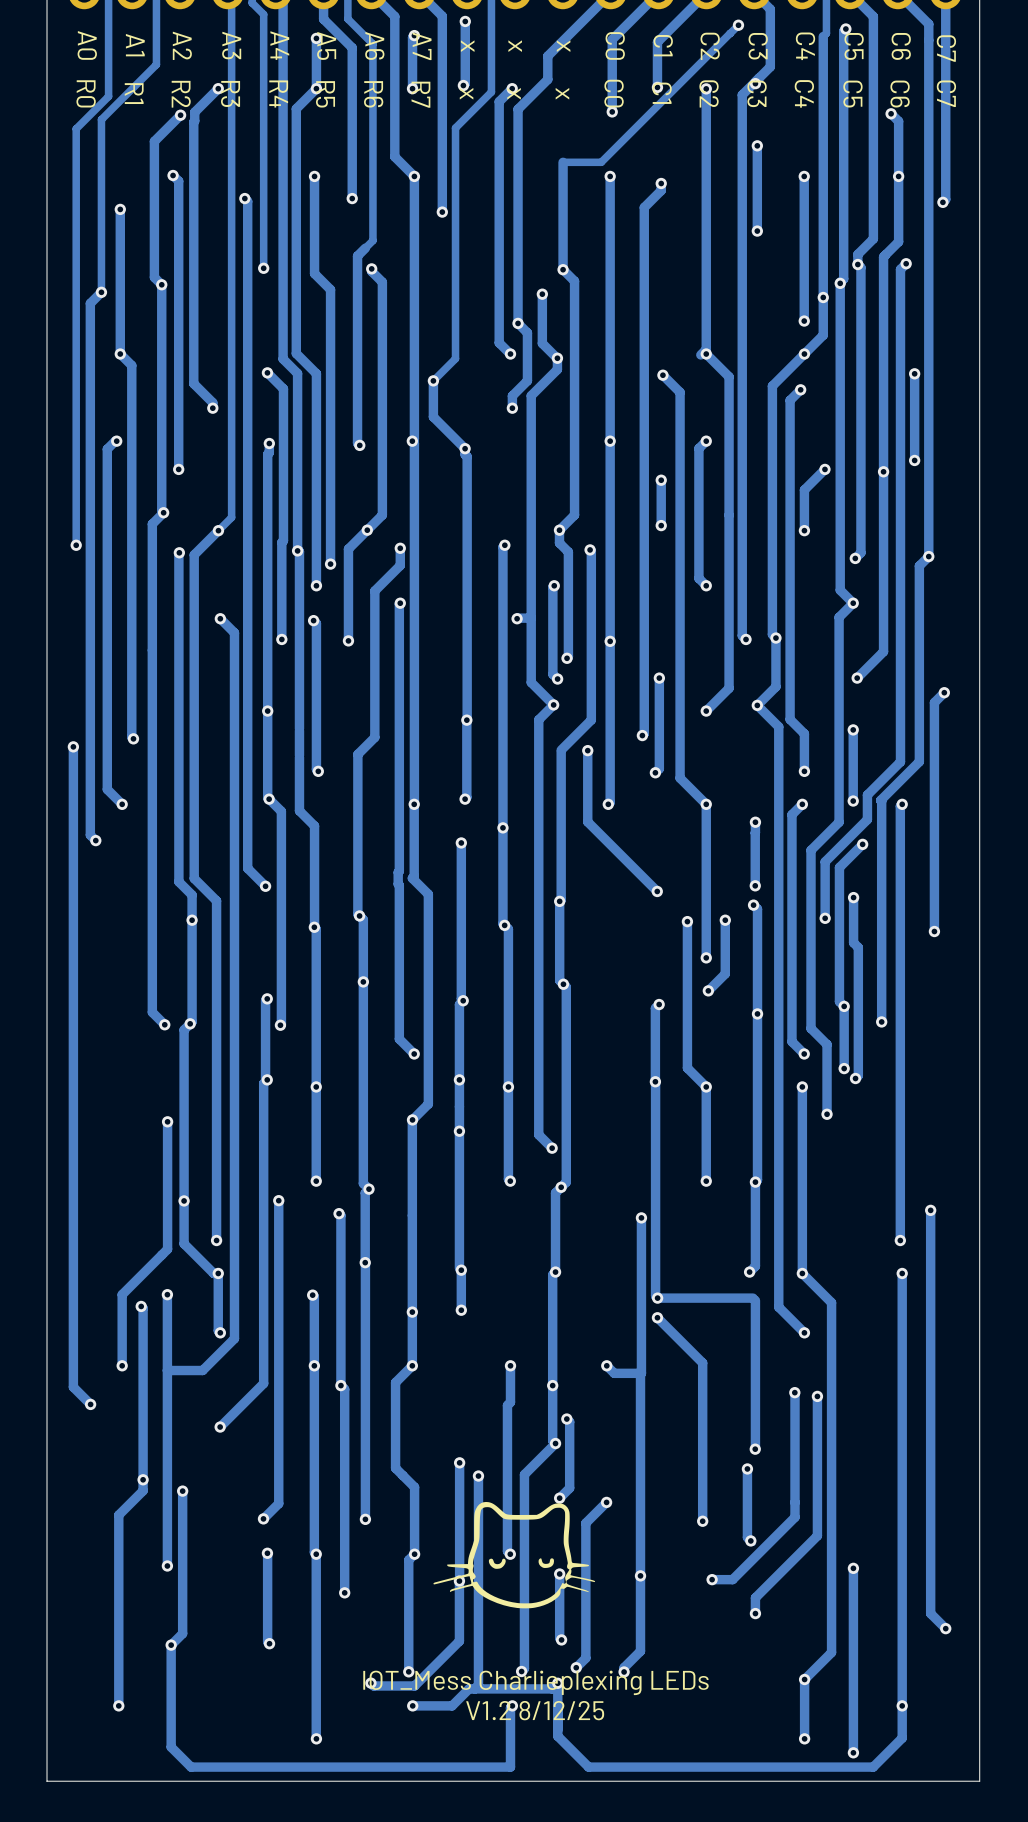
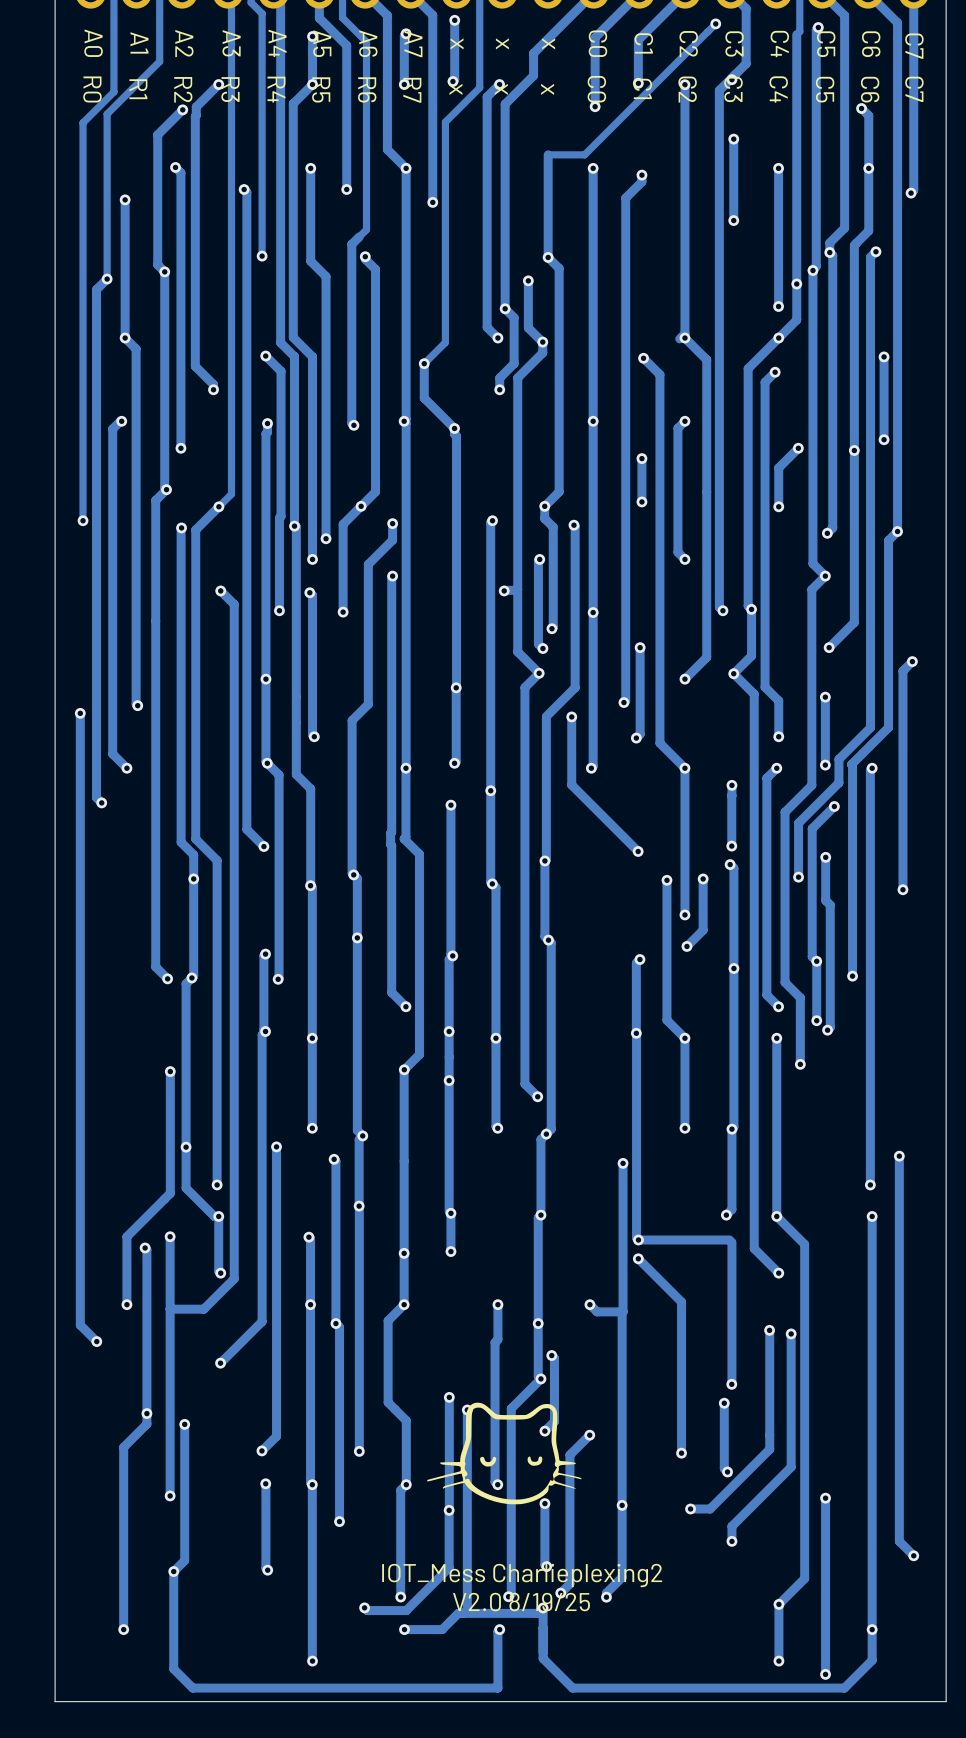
drawing position: (514, 1555) -> (504, 1453)
text: none -> IOT_Mess Charlieplexing2 (522, 1575)
text: IOT_Mess Charlieplexing LEDs (535, 1682) -> V2.0 8/19/25 (521, 1602)
text: V1.2 8/12/25 (535, 1710) -> none

